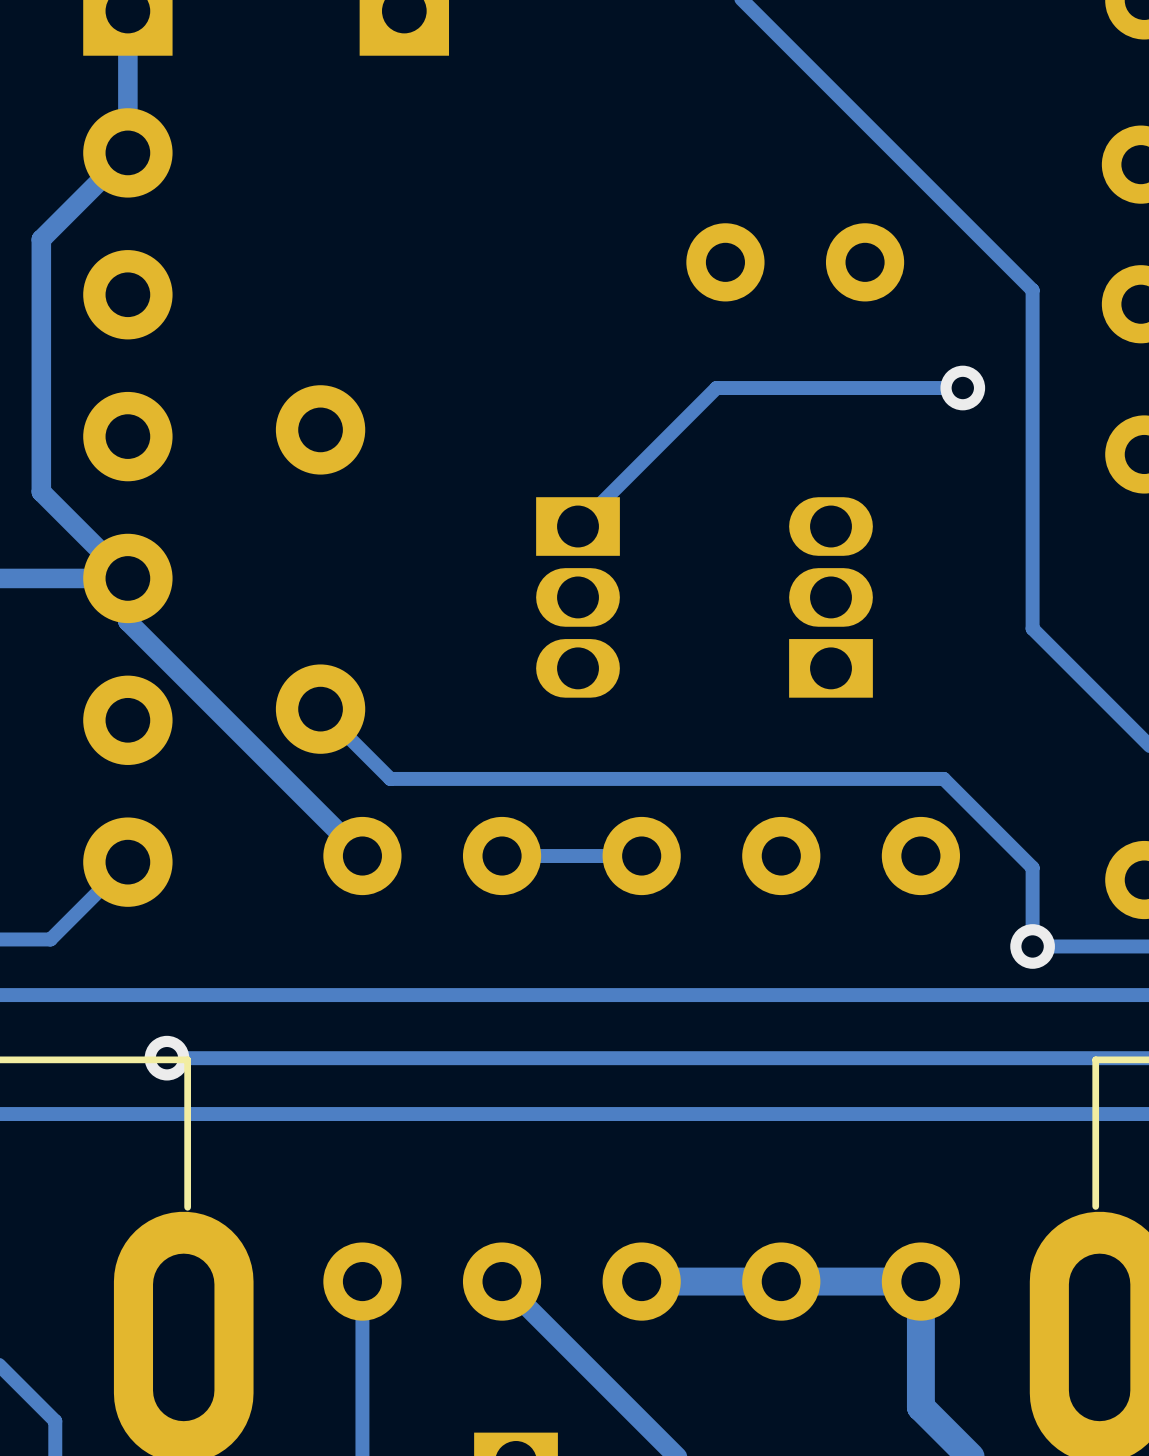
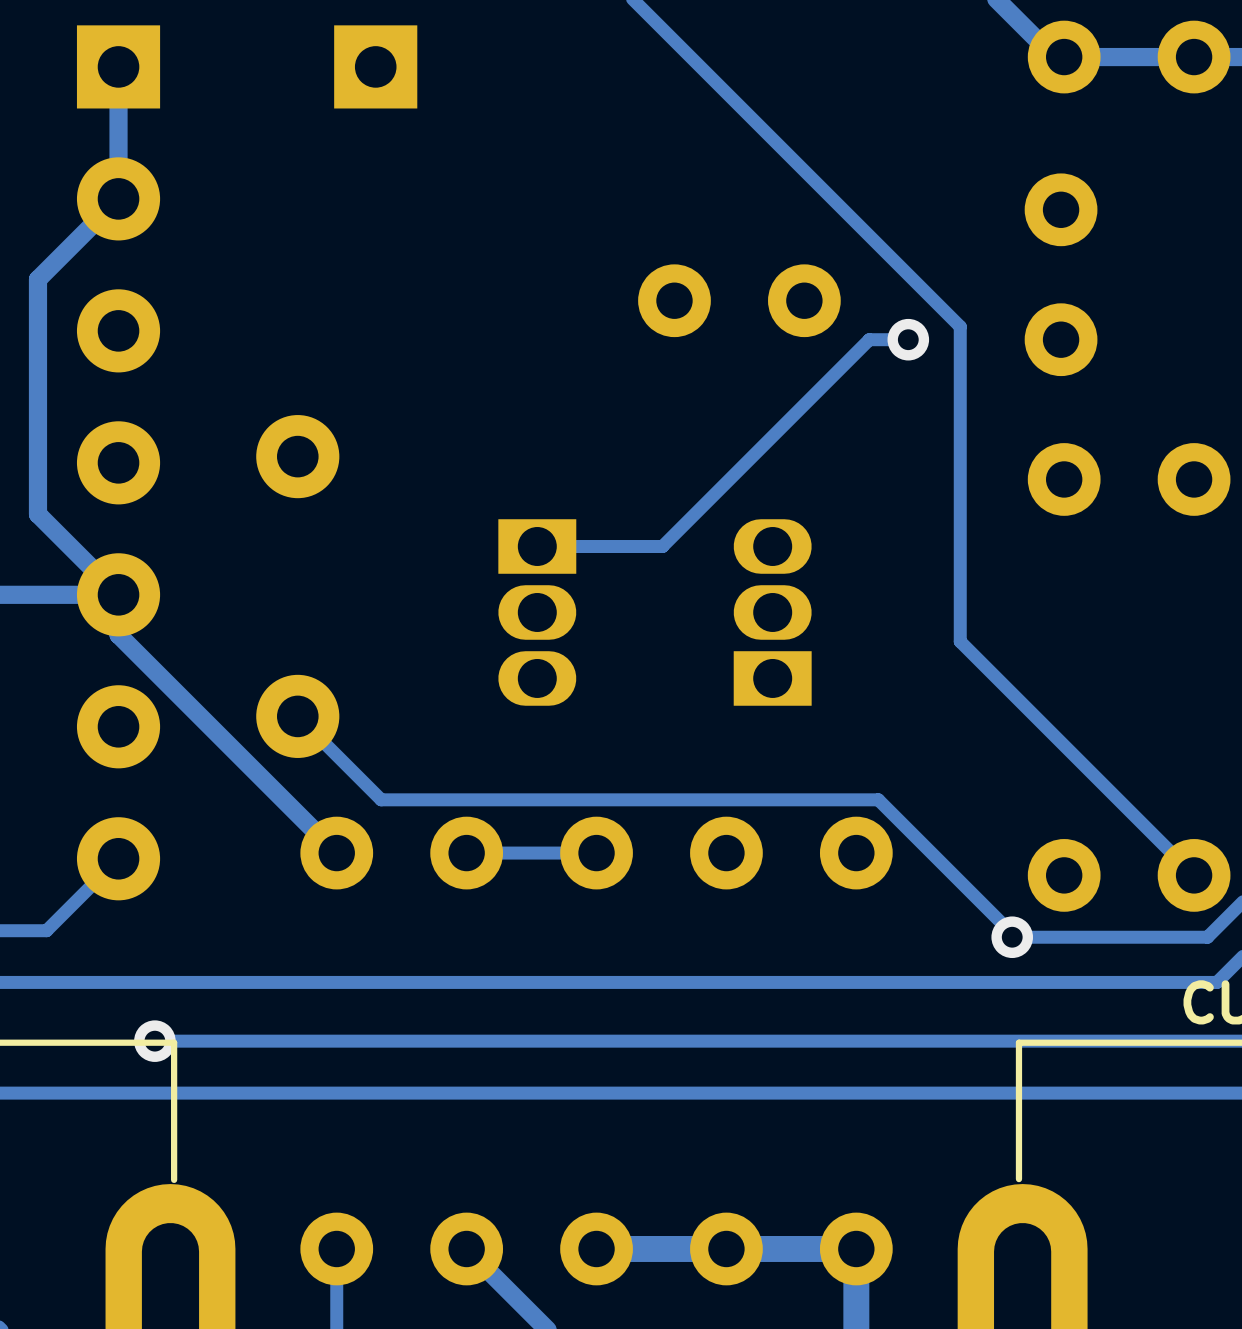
track: (962, 388) (716, 388) (578, 526) -> (908, 339) (869, 339) (662, 546) (537, 546)
via position: (962, 388) -> (908, 339)
track: (390, 778) (943, 778) (1032, 867) (1032, 946) (1088, 946) -> (362, 781) (381, 799) (878, 799) (1012, 933) (1012, 937)
via position: (1032, 946) -> (1012, 937)

